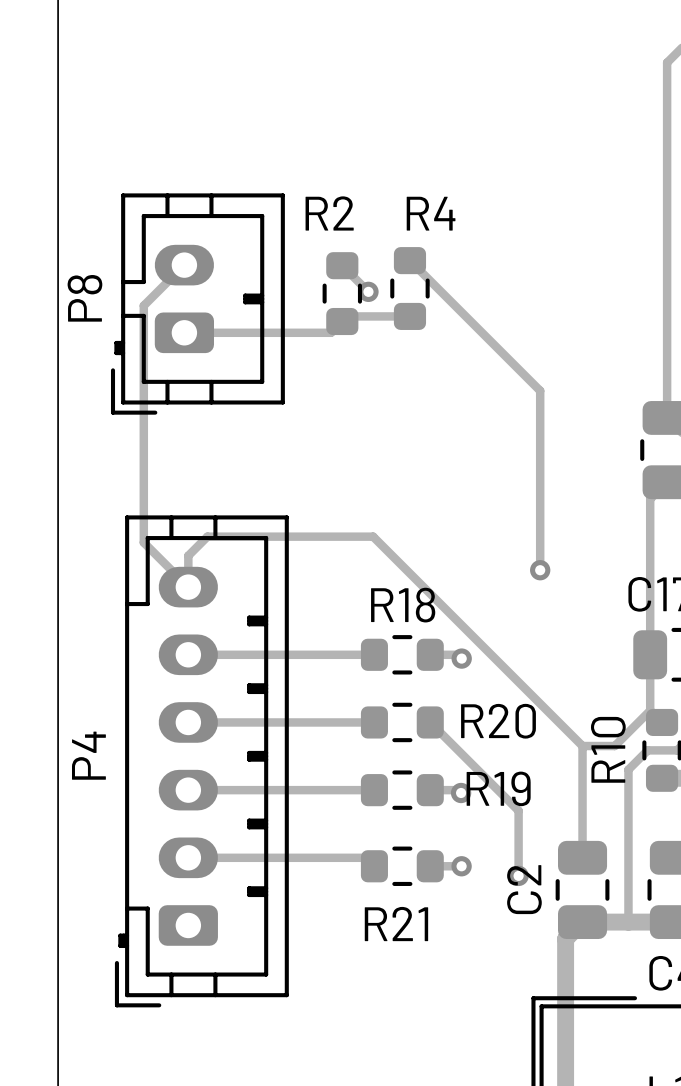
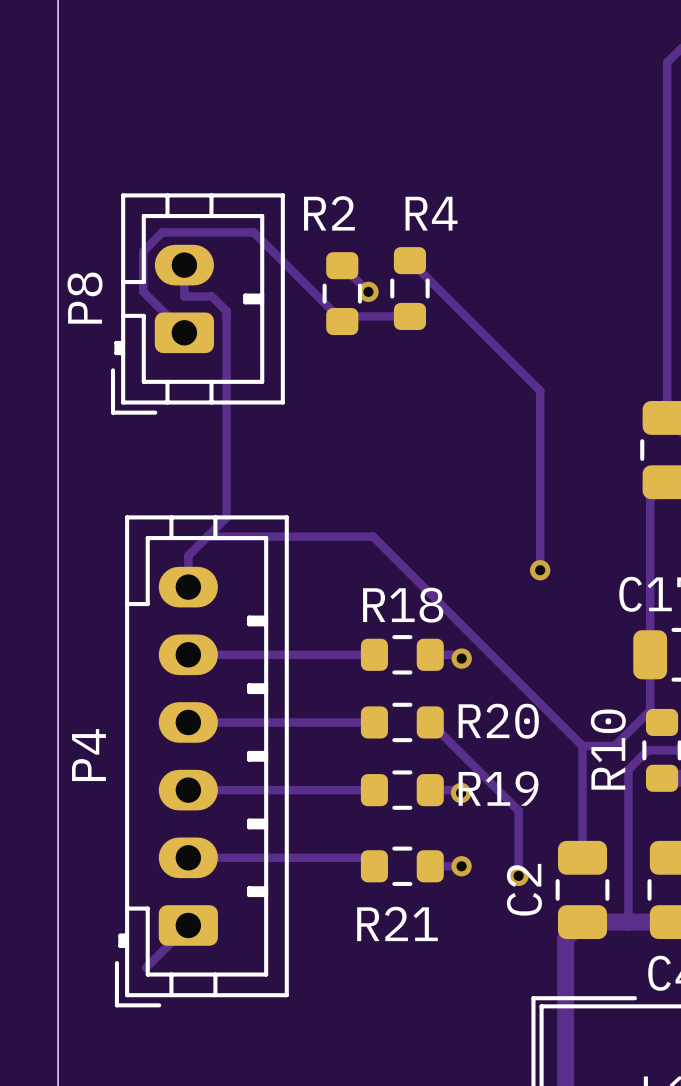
track: (184, 265) (143, 305) (143, 542) (188, 587) -> (184, 265) (184, 296) (211, 296) (226, 311) (226, 517) (207, 536)
track: (342, 321) (331, 332) (184, 332) -> (342, 320) (253, 232) (162, 232) (143, 251) (143, 291) (184, 332)
track: none -> (188, 925) (146, 967)

